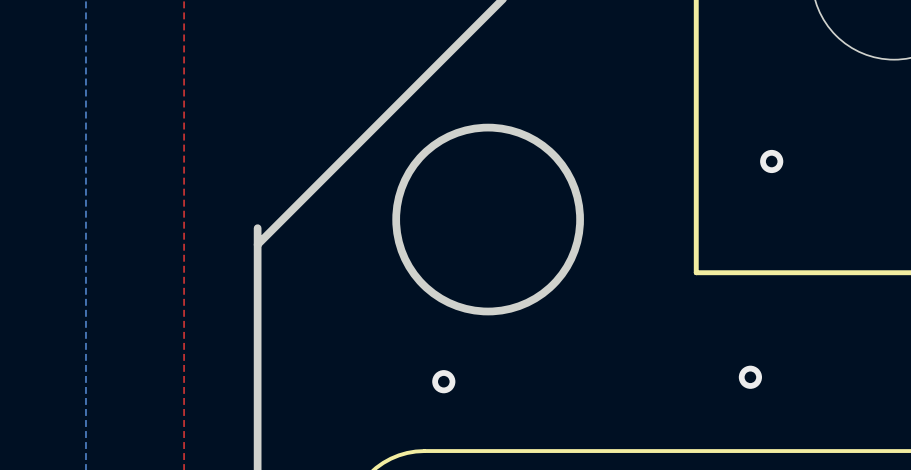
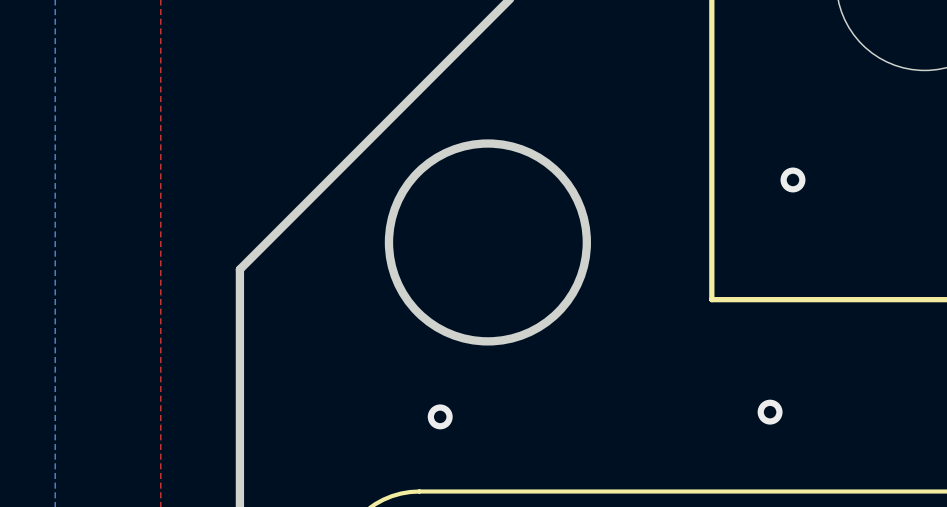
board edge: (257, 228) (257, 244) -> none

